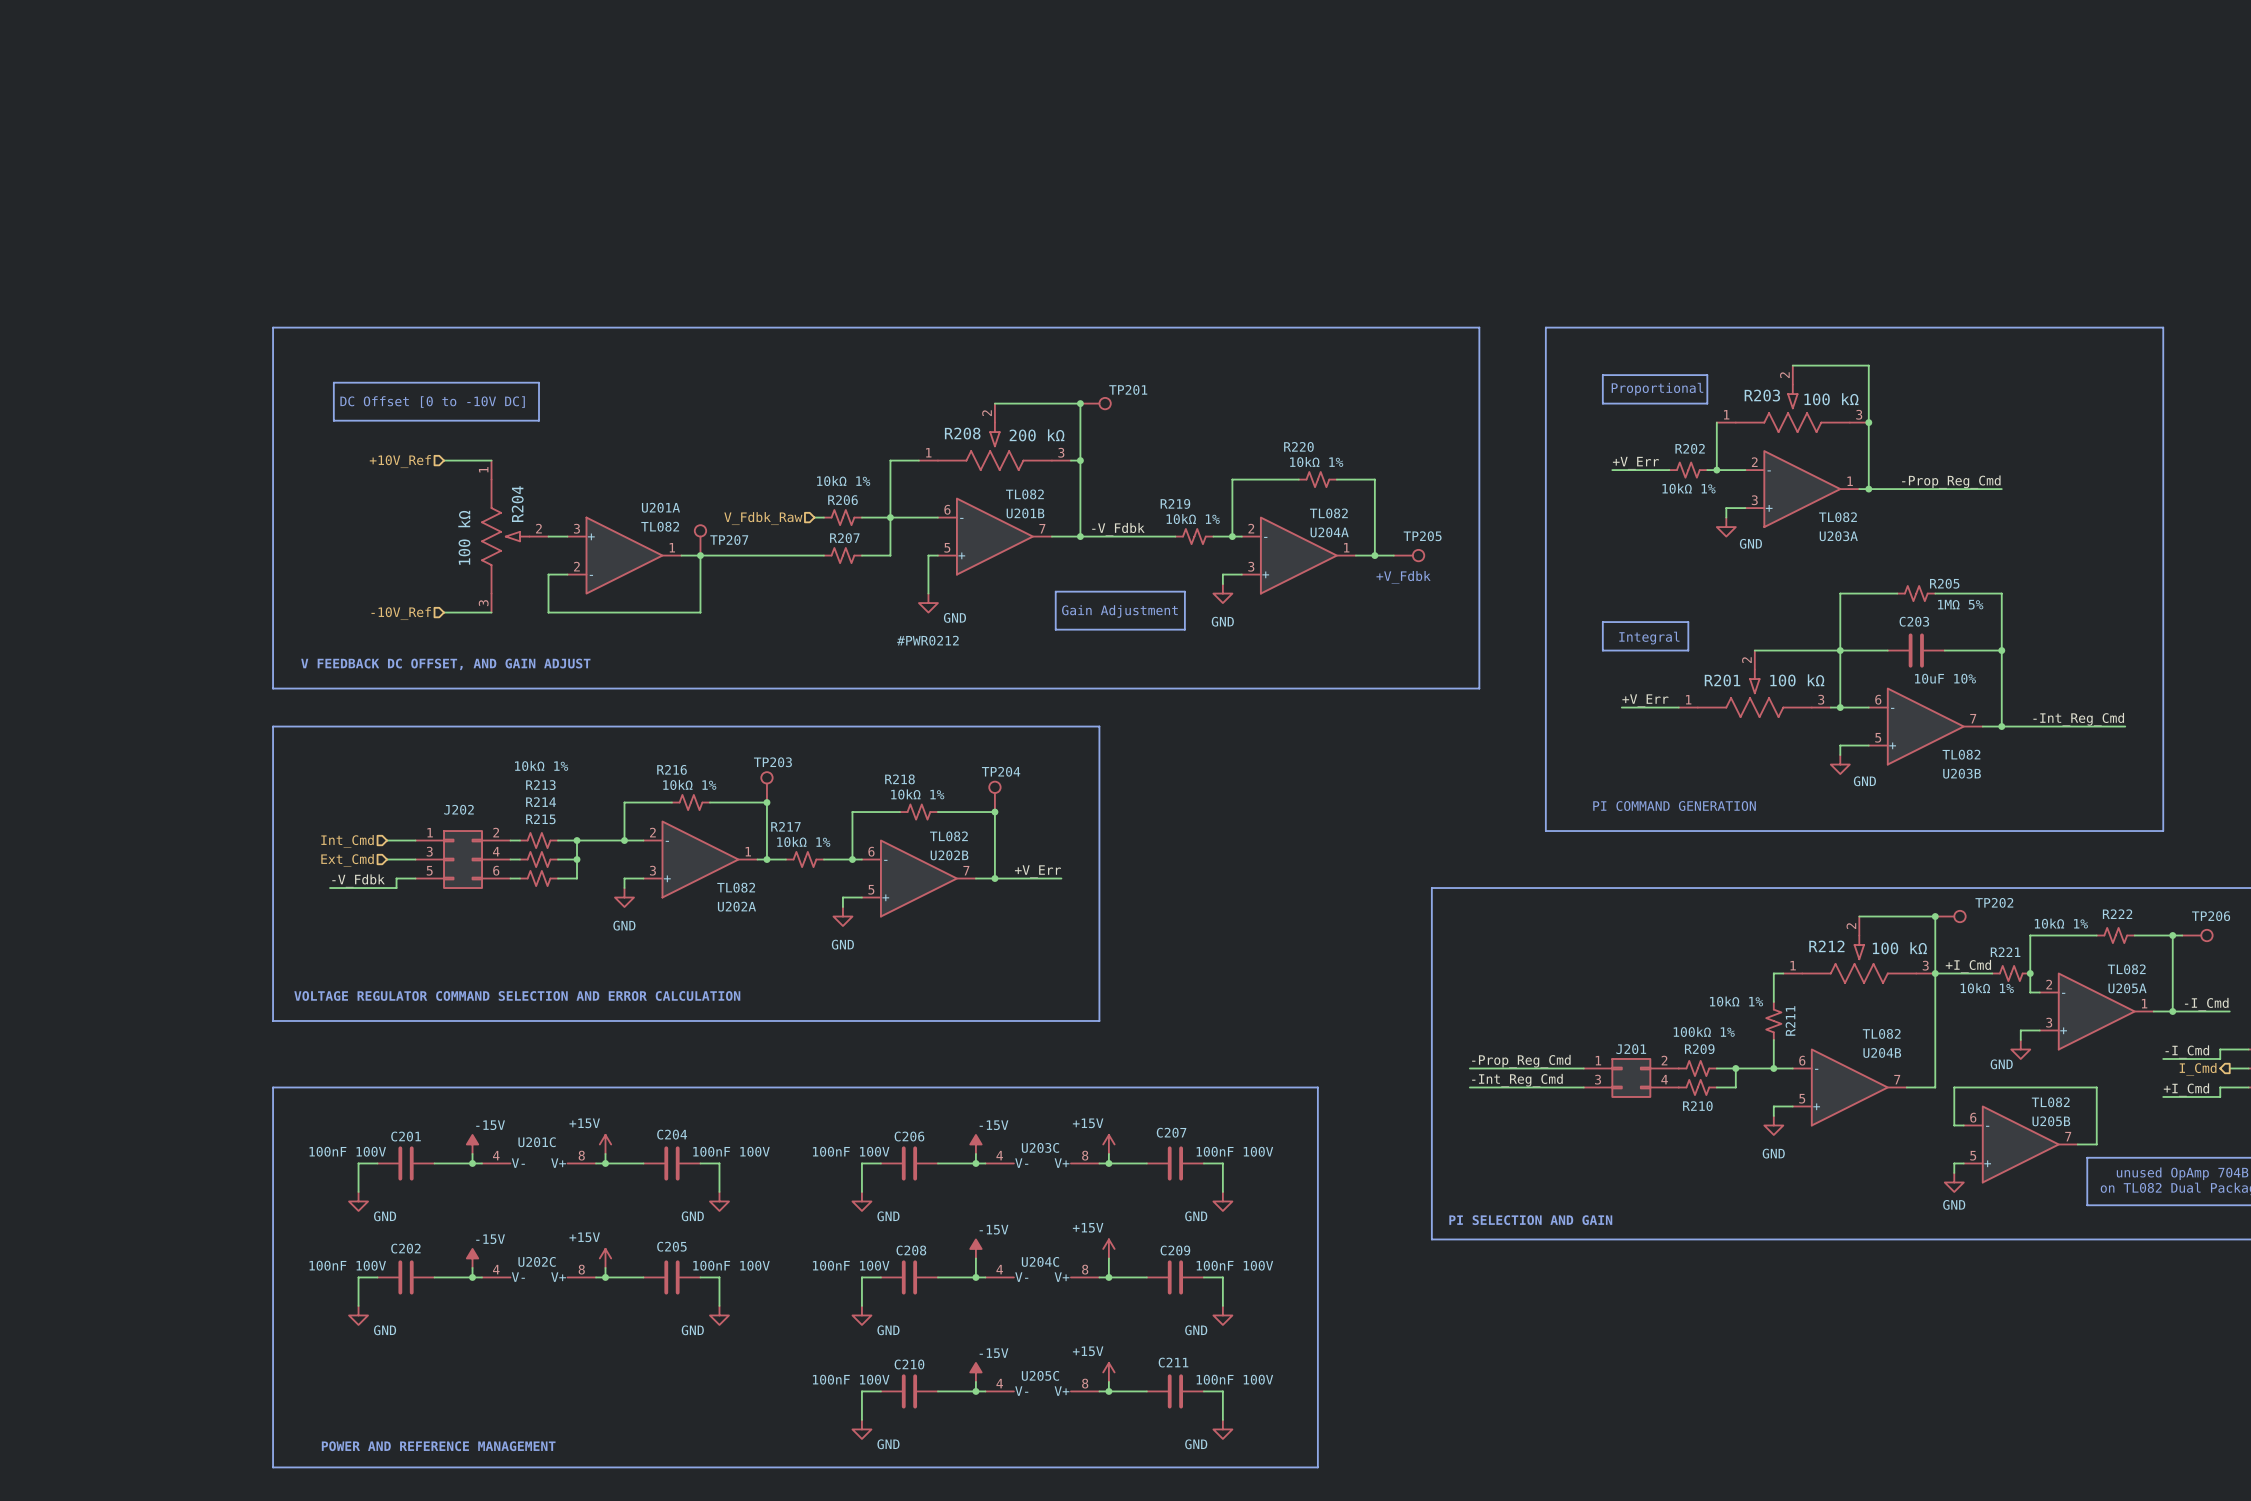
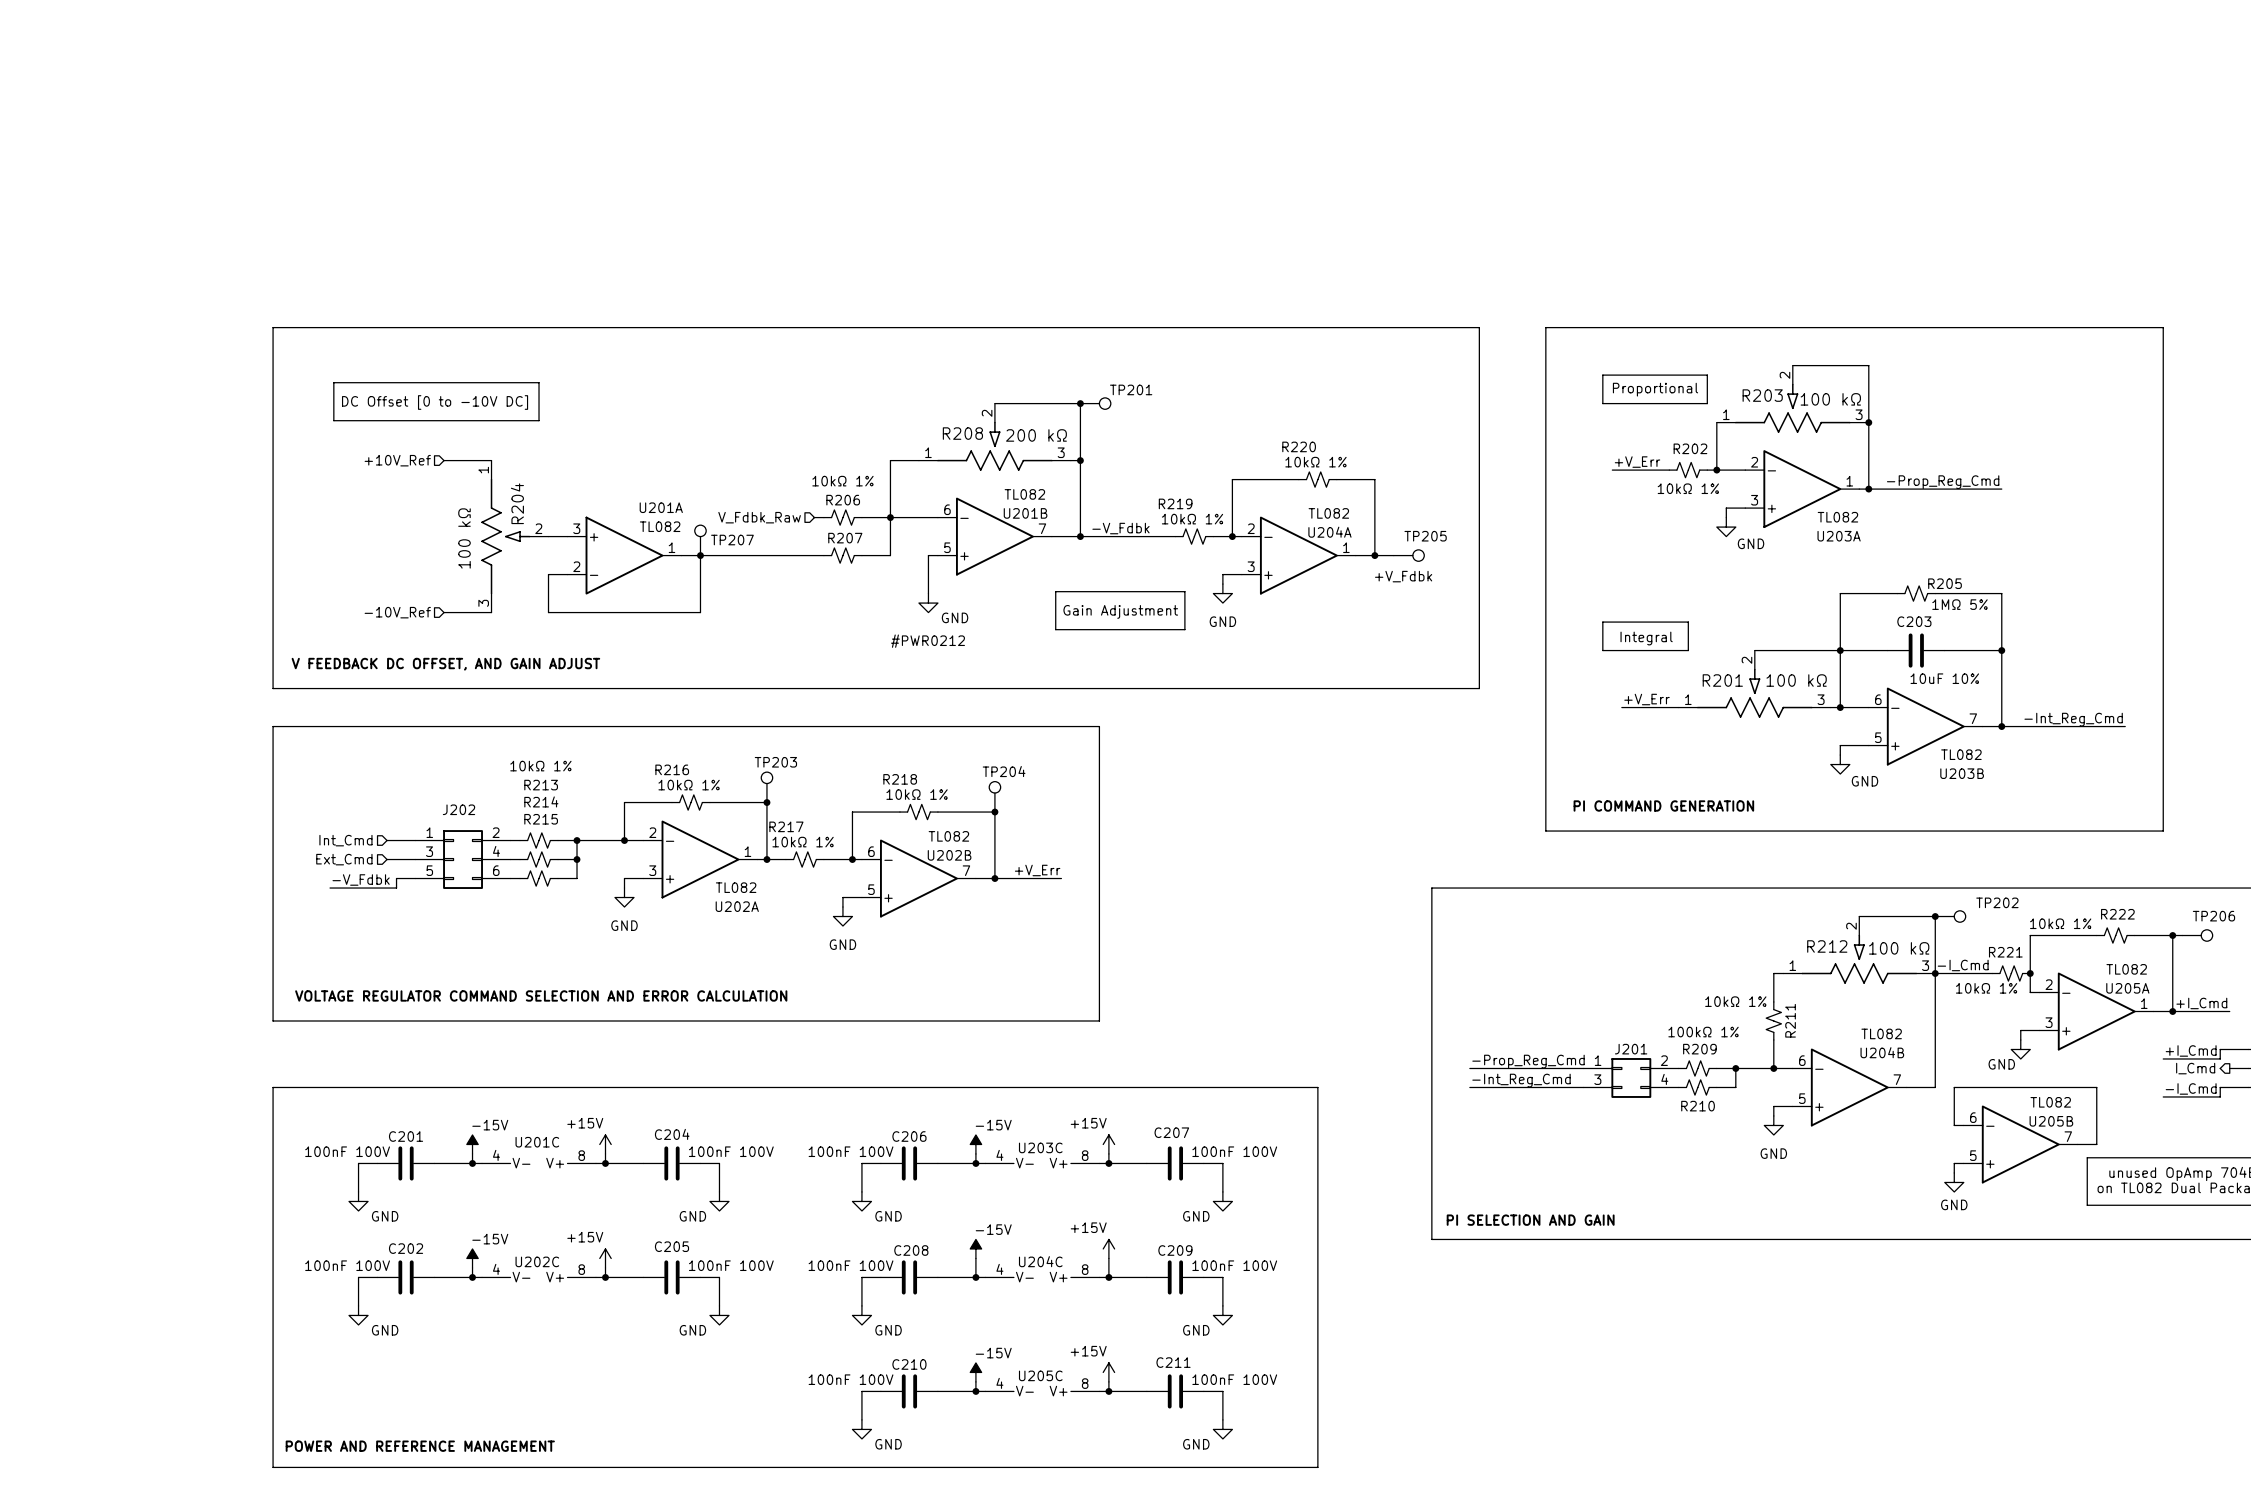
label: +I_Cmd (1968, 966) -> -I_Cmd (1963, 965)
label: -I_Cmd (2206, 1004) -> +I_Cmd (2201, 1003)
label: -I_Cmd (2187, 1051) -> +I_Cmd (2191, 1050)
label: +I_Cmd (2186, 1089) -> -I_Cmd (2191, 1088)

